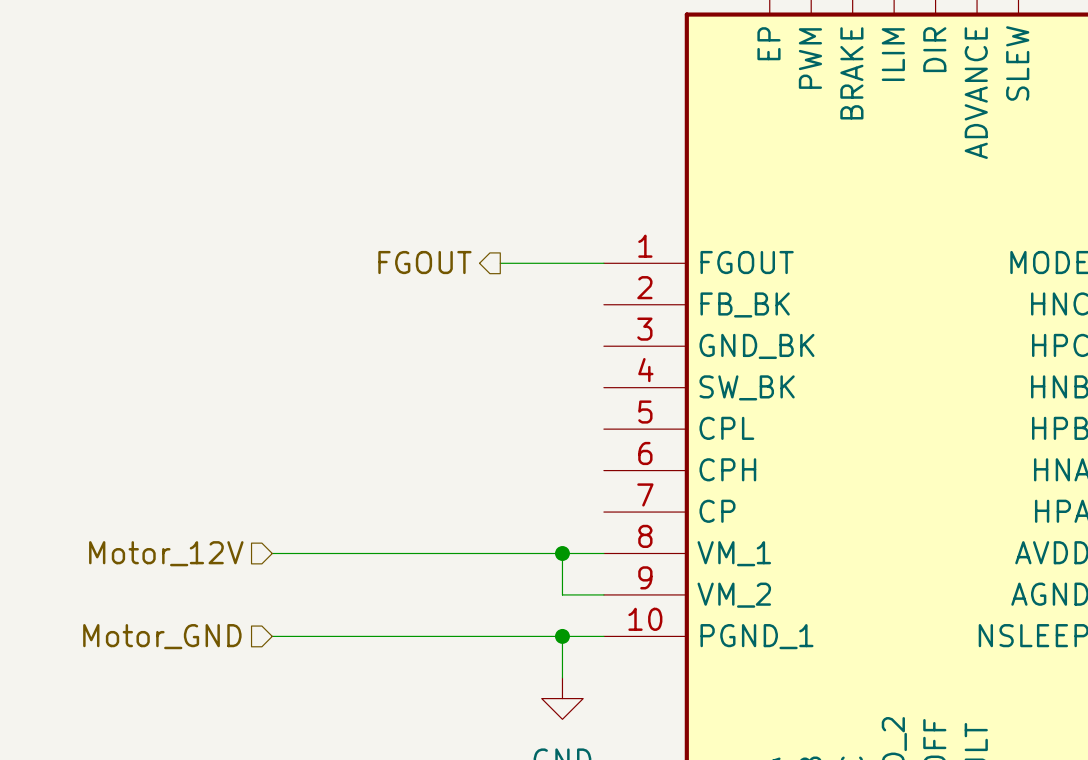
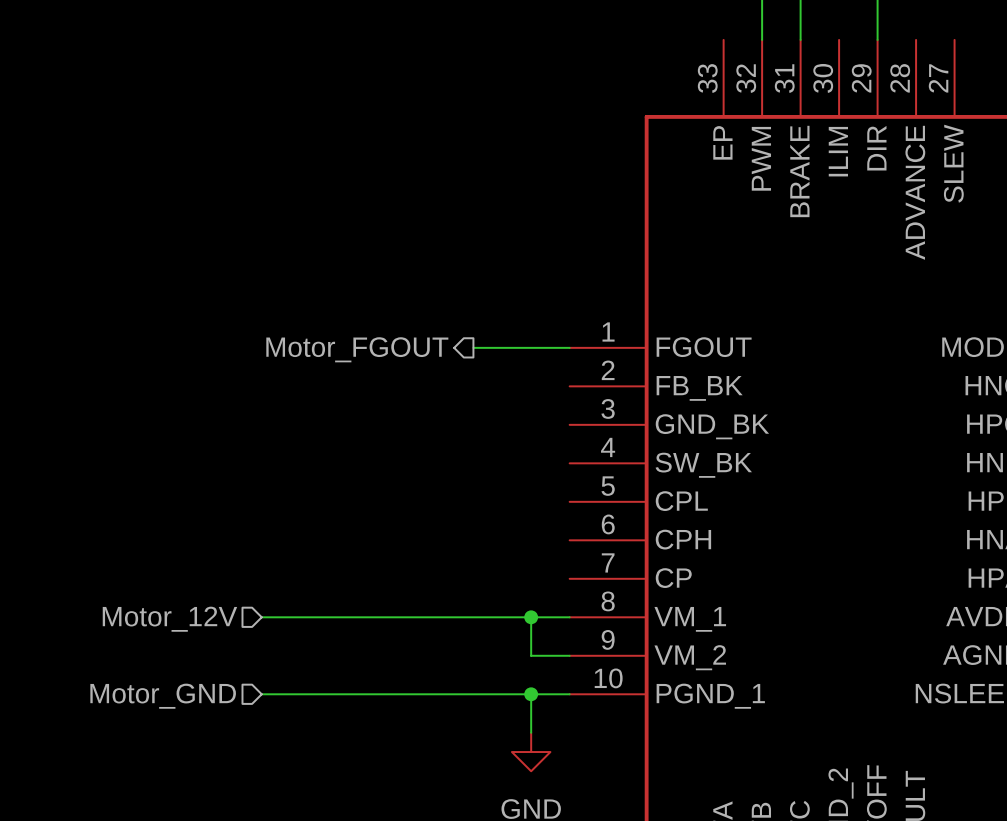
hierarchical label: FGOUT (424, 262) -> Motor_FGOUT (357, 349)

